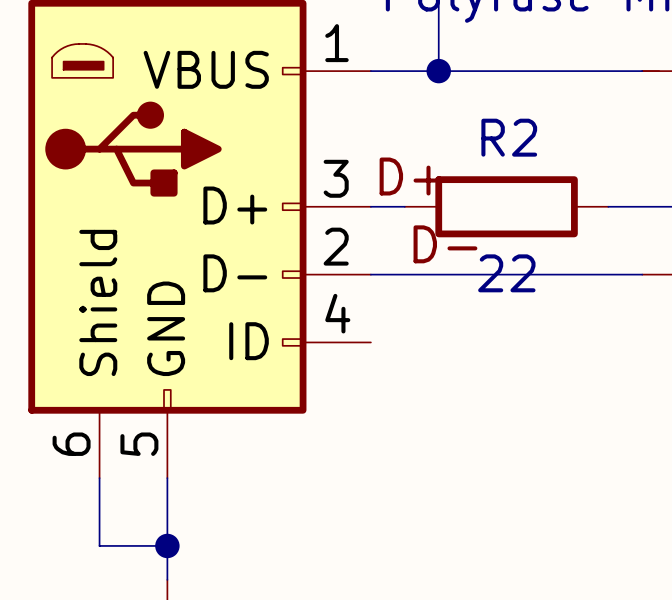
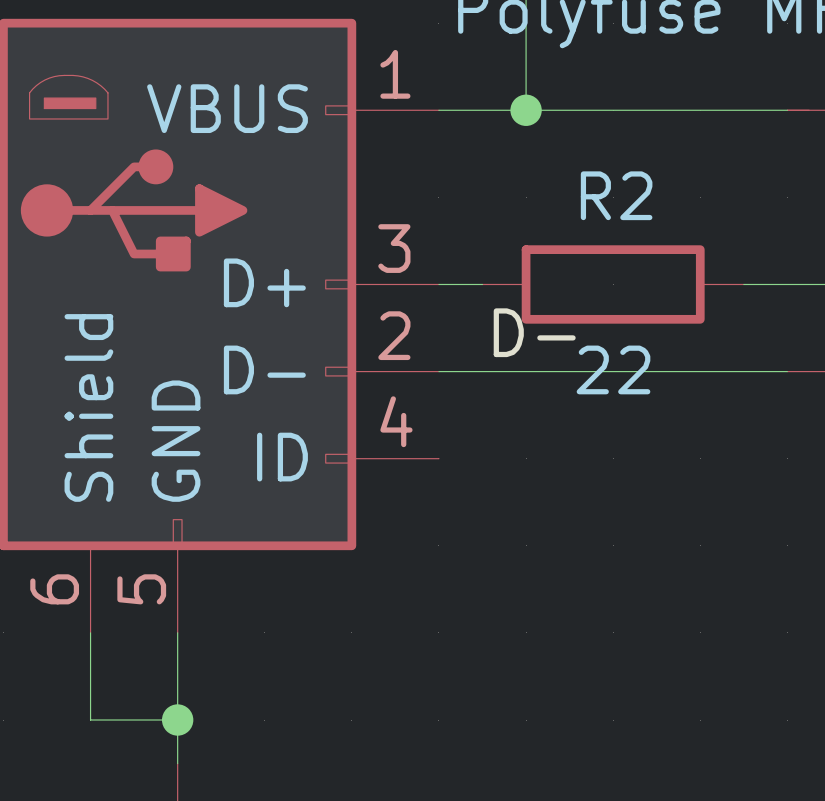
label: D+ (411, 176) -> none

